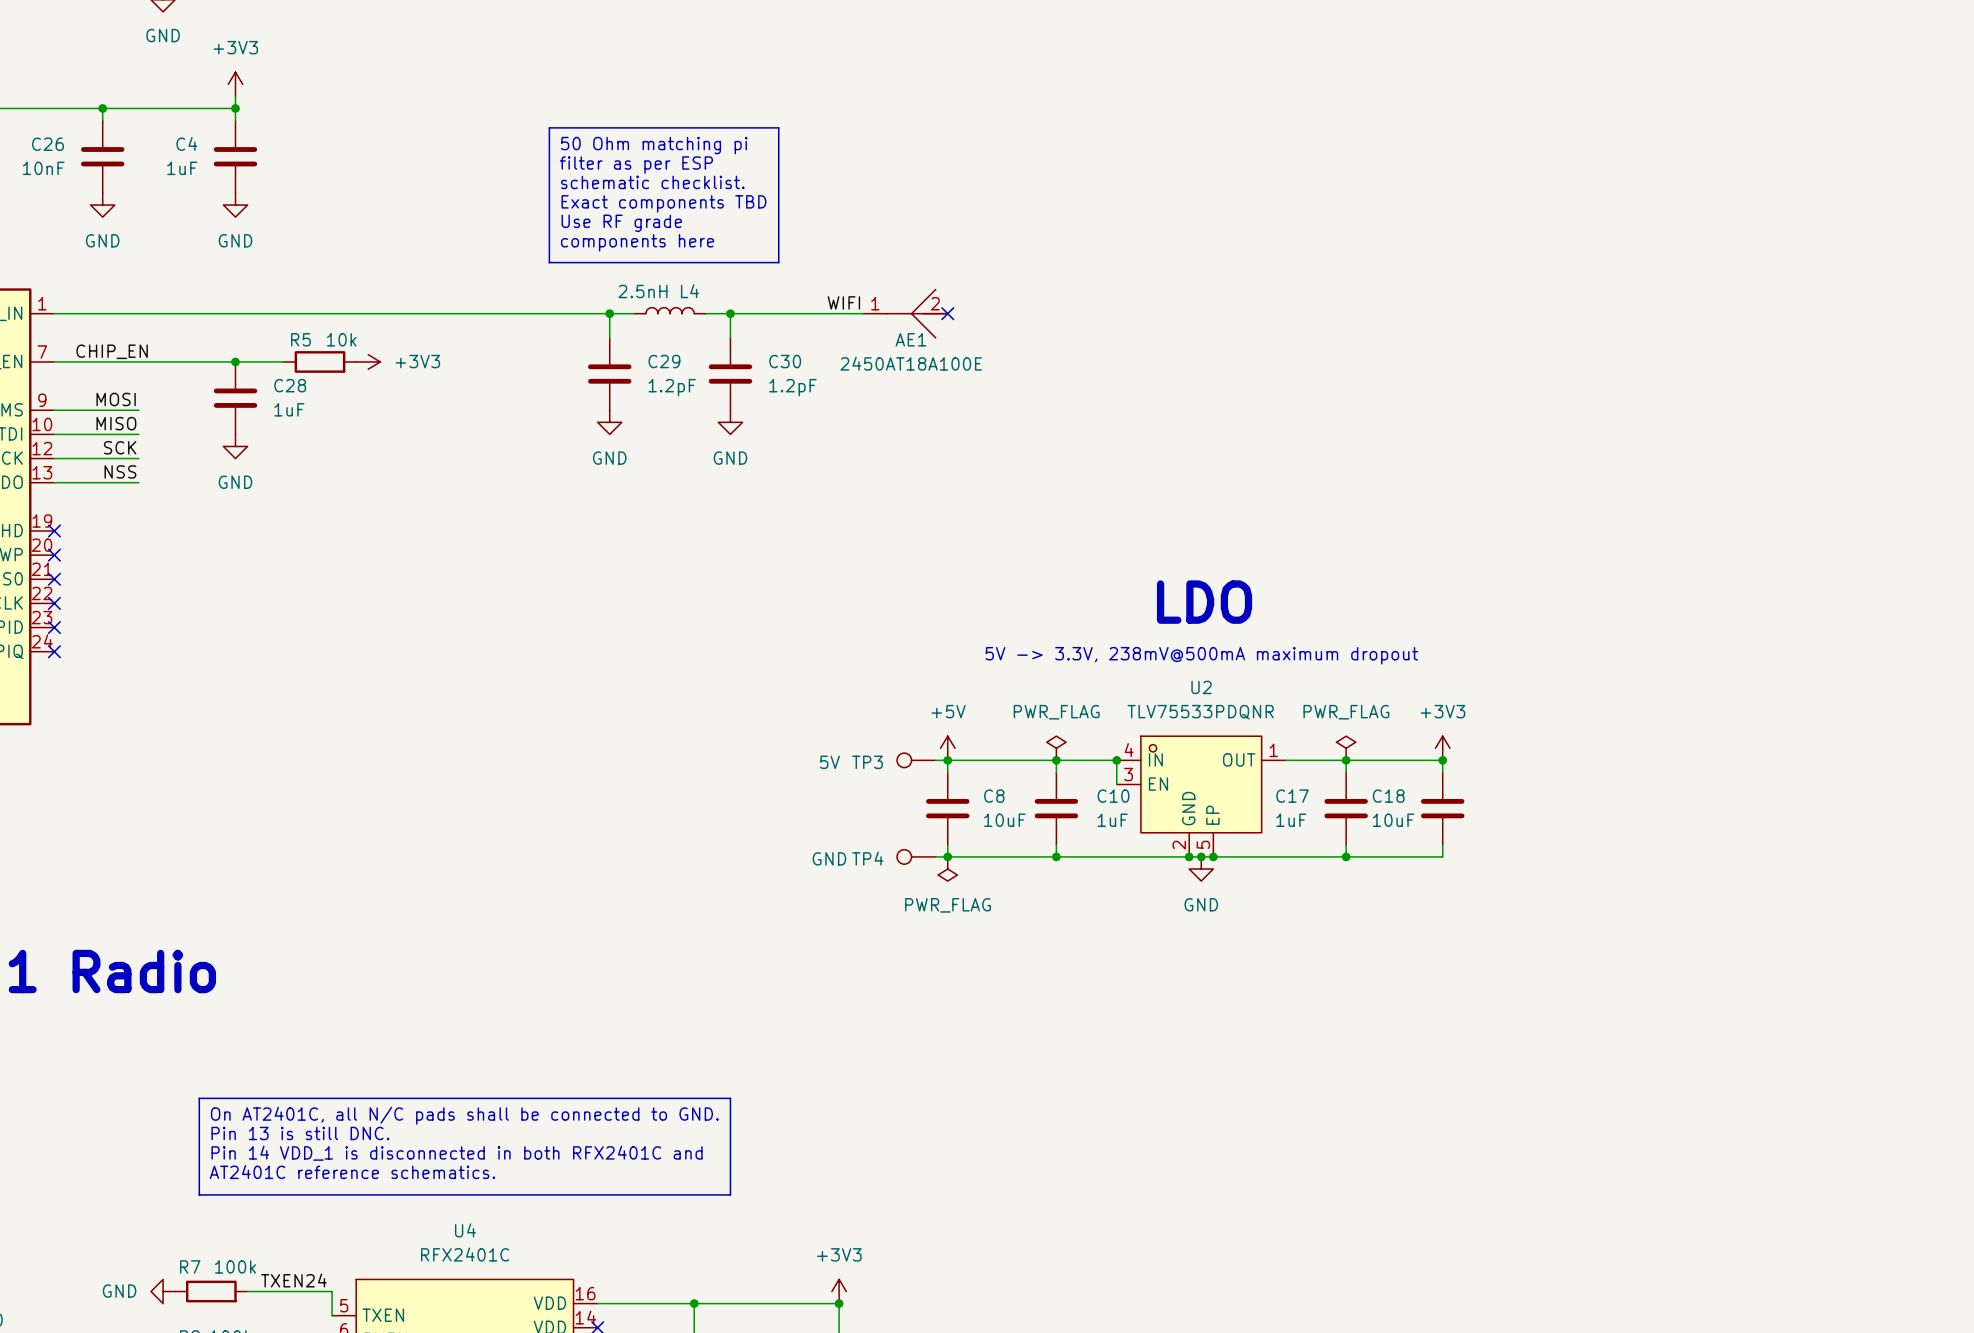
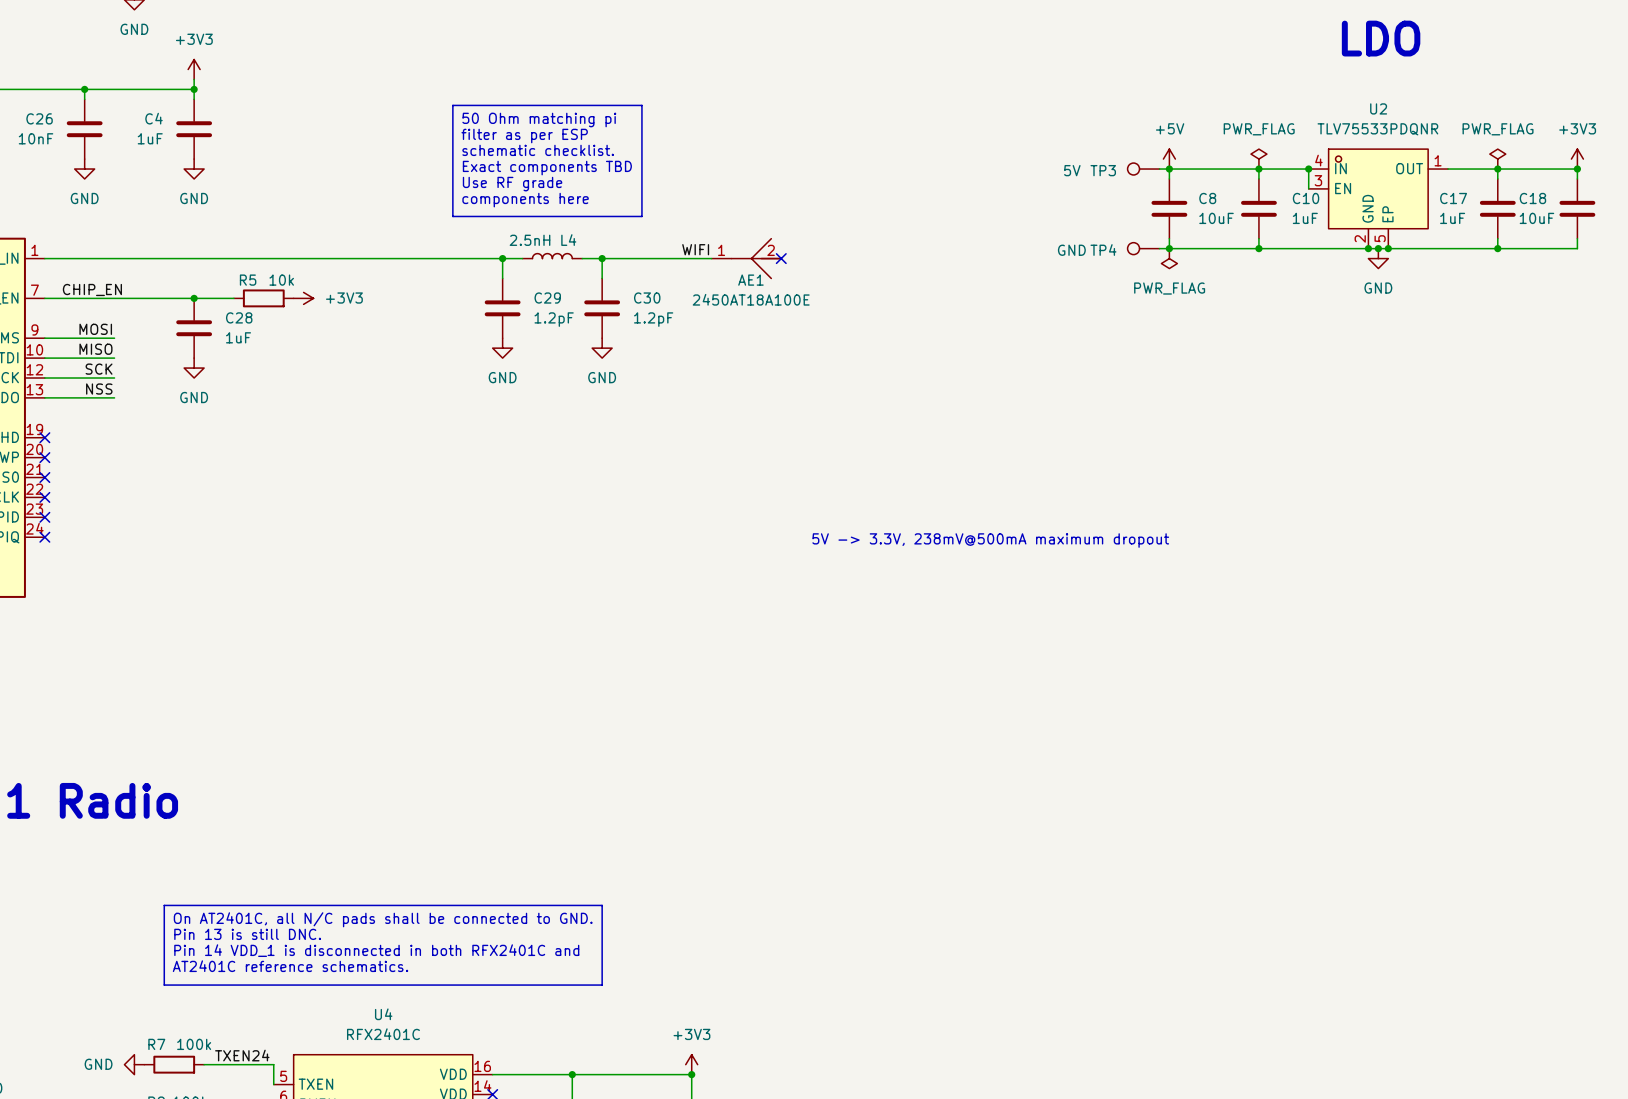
text: none -> LDO (1381, 38)
power symbol: none -> +5V (1169, 159)
power symbol: none -> PWR_FLAG (1258, 159)
power symbol: none -> PWR_FLAG (1497, 159)
power symbol: none -> +3V3 (1577, 159)
wire: none -> (1159, 169) (1308, 169) (1308, 188)
wire: none -> (1169, 169) (1169, 178)
junction: none -> (1169, 169)
wire: none -> (1258, 169) (1258, 178)
junction: none -> (1258, 169)
junction: none -> (1308, 169)
wire: none -> (1448, 169) (1577, 169) (1577, 178)
wire: none -> (1497, 169) (1497, 178)
junction: none -> (1497, 169)
junction: none -> (1577, 169)
wire: none -> (1169, 238) (1169, 248)
wire: none -> (1258, 238) (1258, 248)
wire: none -> (1497, 238) (1497, 248)
wire: none -> (1577, 238) (1577, 248) (1159, 248)
junction: none -> (1169, 248)
junction: none -> (1258, 248)
junction: none -> (1368, 248)
junction: none -> (1378, 248)
junction: none -> (1388, 248)
junction: none -> (1497, 248)
power symbol: none -> PWR_FLAG (1169, 258)
power symbol: none -> GND (1378, 258)
text: LDO (1204, 602) -> none
power symbol: +5V (947, 748) -> none
power symbol: PWR_FLAG (1056, 748) -> none
power symbol: PWR_FLAG (1346, 748) -> none
power symbol: +3V3 (1442, 748) -> none
TP3 position: (916, 760) -> (1143, 169)
wire: (935, 760) (1116, 760) (1116, 784) -> none
wire: (947, 760) (947, 772) -> none
junction: (947, 760) -> none
wire: (1056, 760) (1056, 772) -> none
junction: (1056, 760) -> none
junction: (1116, 760) -> none
wire: (1285, 760) (1442, 760) (1442, 772) -> none
wire: (1346, 760) (1346, 772) -> none
junction: (1346, 760) -> none
junction: (1442, 760) -> none
U2 position: (1201, 796) -> (1378, 198)
C8 position: (947, 808) -> (1169, 208)
C10 position: (1056, 808) -> (1258, 208)
C17 position: (1346, 808) -> (1497, 208)
C18 position: (1442, 808) -> (1577, 208)
wire: (947, 844) (947, 856) -> none
wire: (1056, 844) (1056, 856) -> none
wire: (1346, 844) (1346, 856) -> none
wire: (1442, 844) (1442, 856) (935, 856) -> none
TP4 position: (916, 856) -> (1143, 248)
junction: (947, 856) -> none
junction: (1056, 856) -> none
junction: (1189, 856) -> none
junction: (1201, 856) -> none
junction: (1213, 856) -> none
junction: (1346, 856) -> none
power symbol: PWR_FLAG (947, 869) -> none
power symbol: GND (1201, 869) -> none

